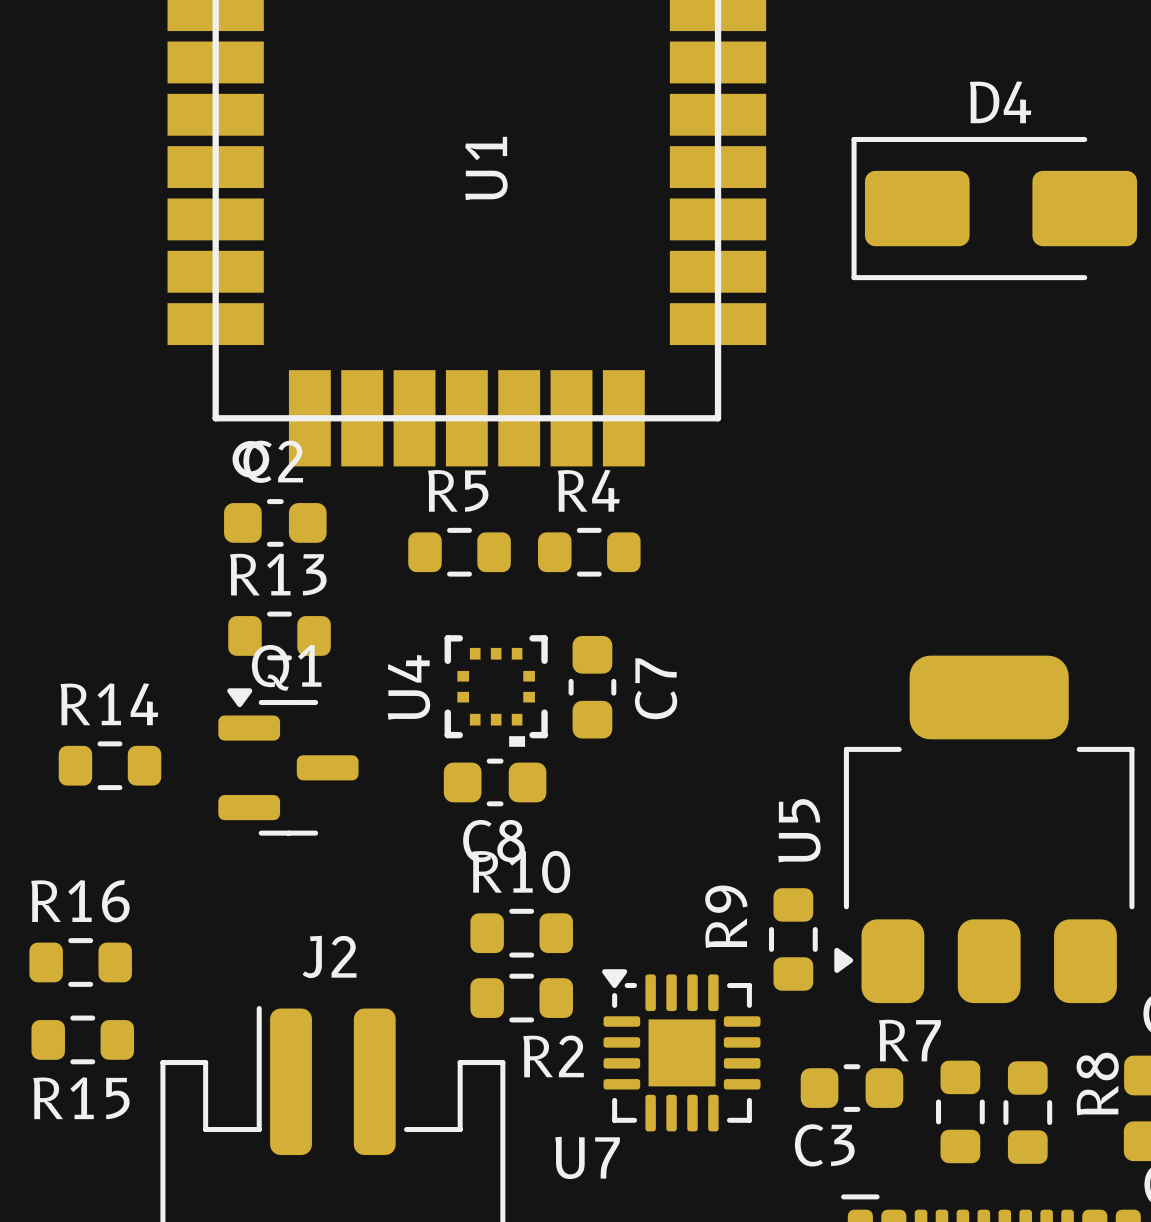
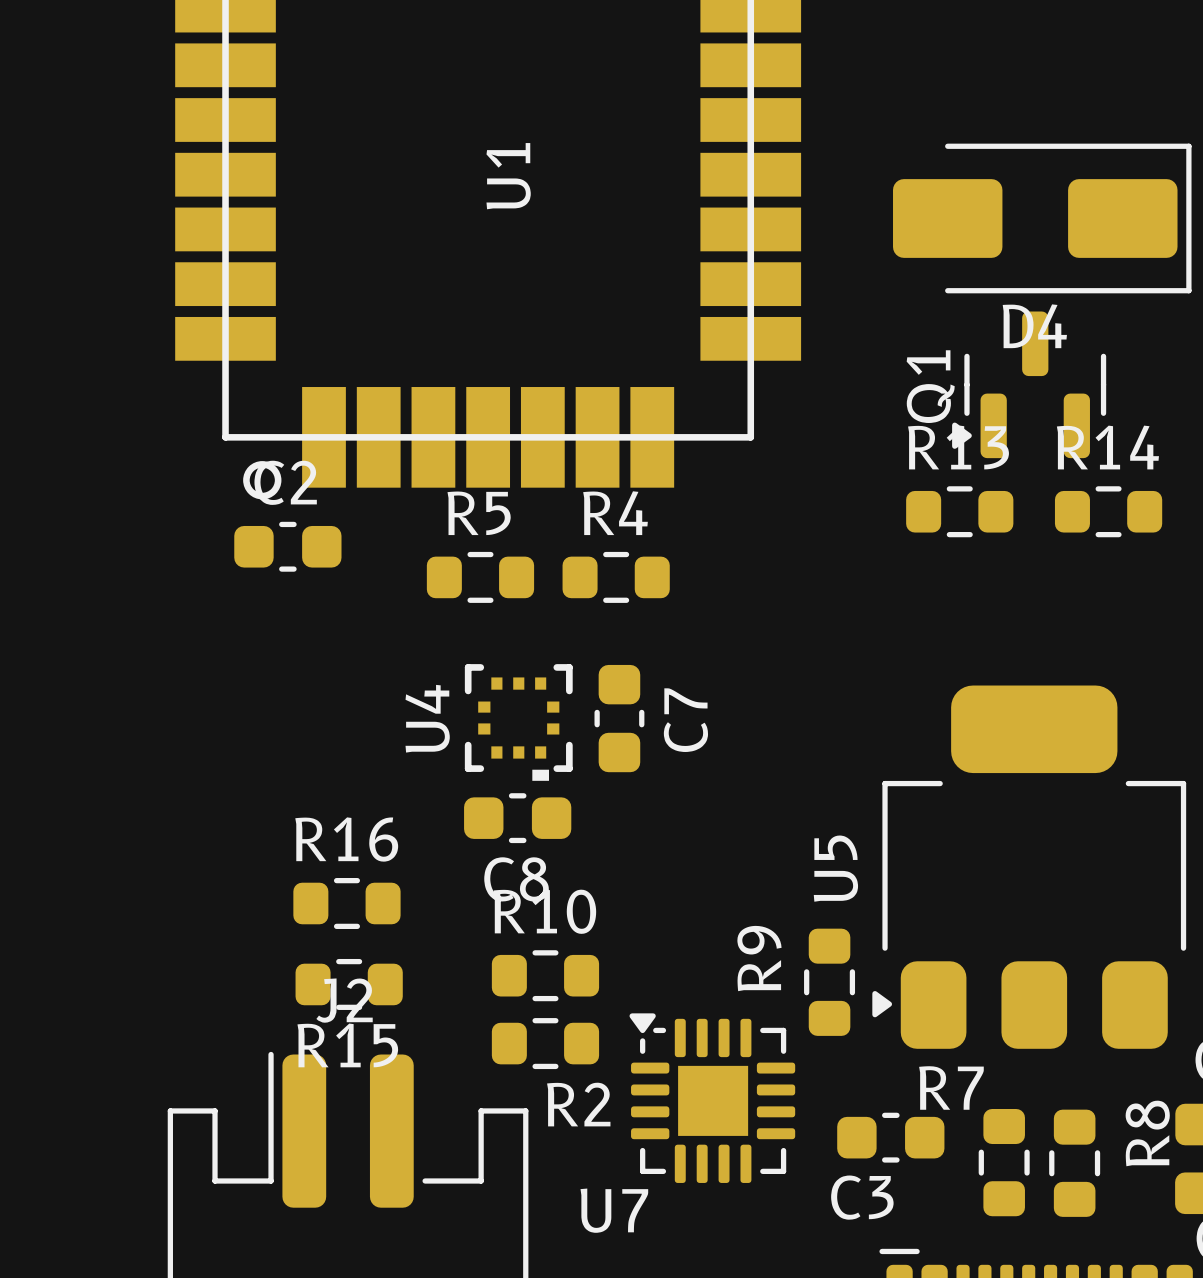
D4 rotation: 0° (994, 208) -> 180° (1042, 218)
R13 position: (279, 635) -> (959, 511)
Q1 rotation: 0° (288, 761) -> 90° counterclockwise (1029, 384)
Q1 position: (288, 761) -> (1029, 384)
R14 position: (109, 765) -> (1108, 511)
R16 position: (80, 962) -> (346, 903)
R15 position: (82, 1039) -> (349, 984)

